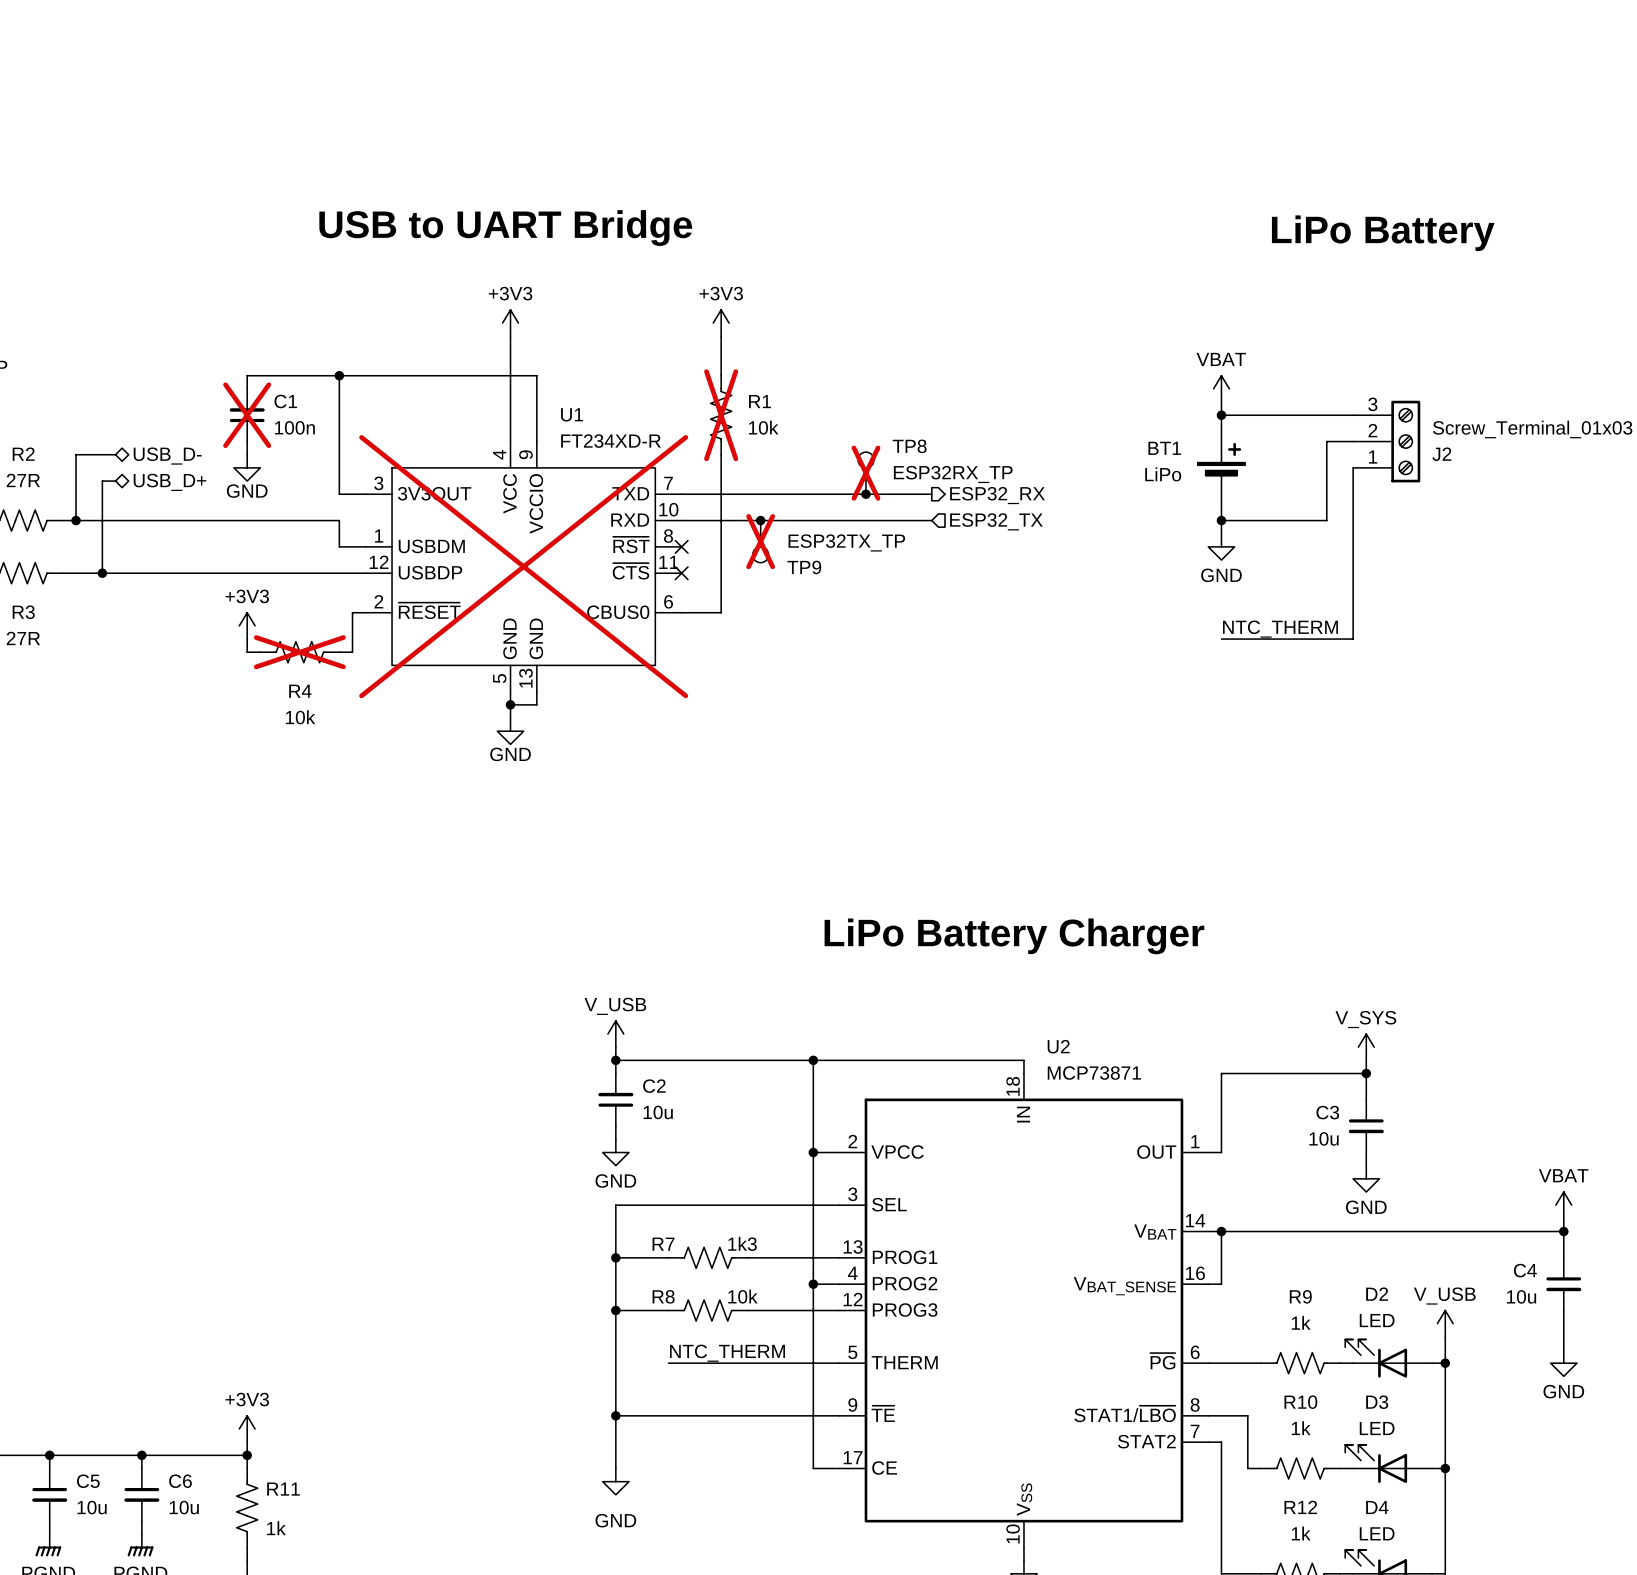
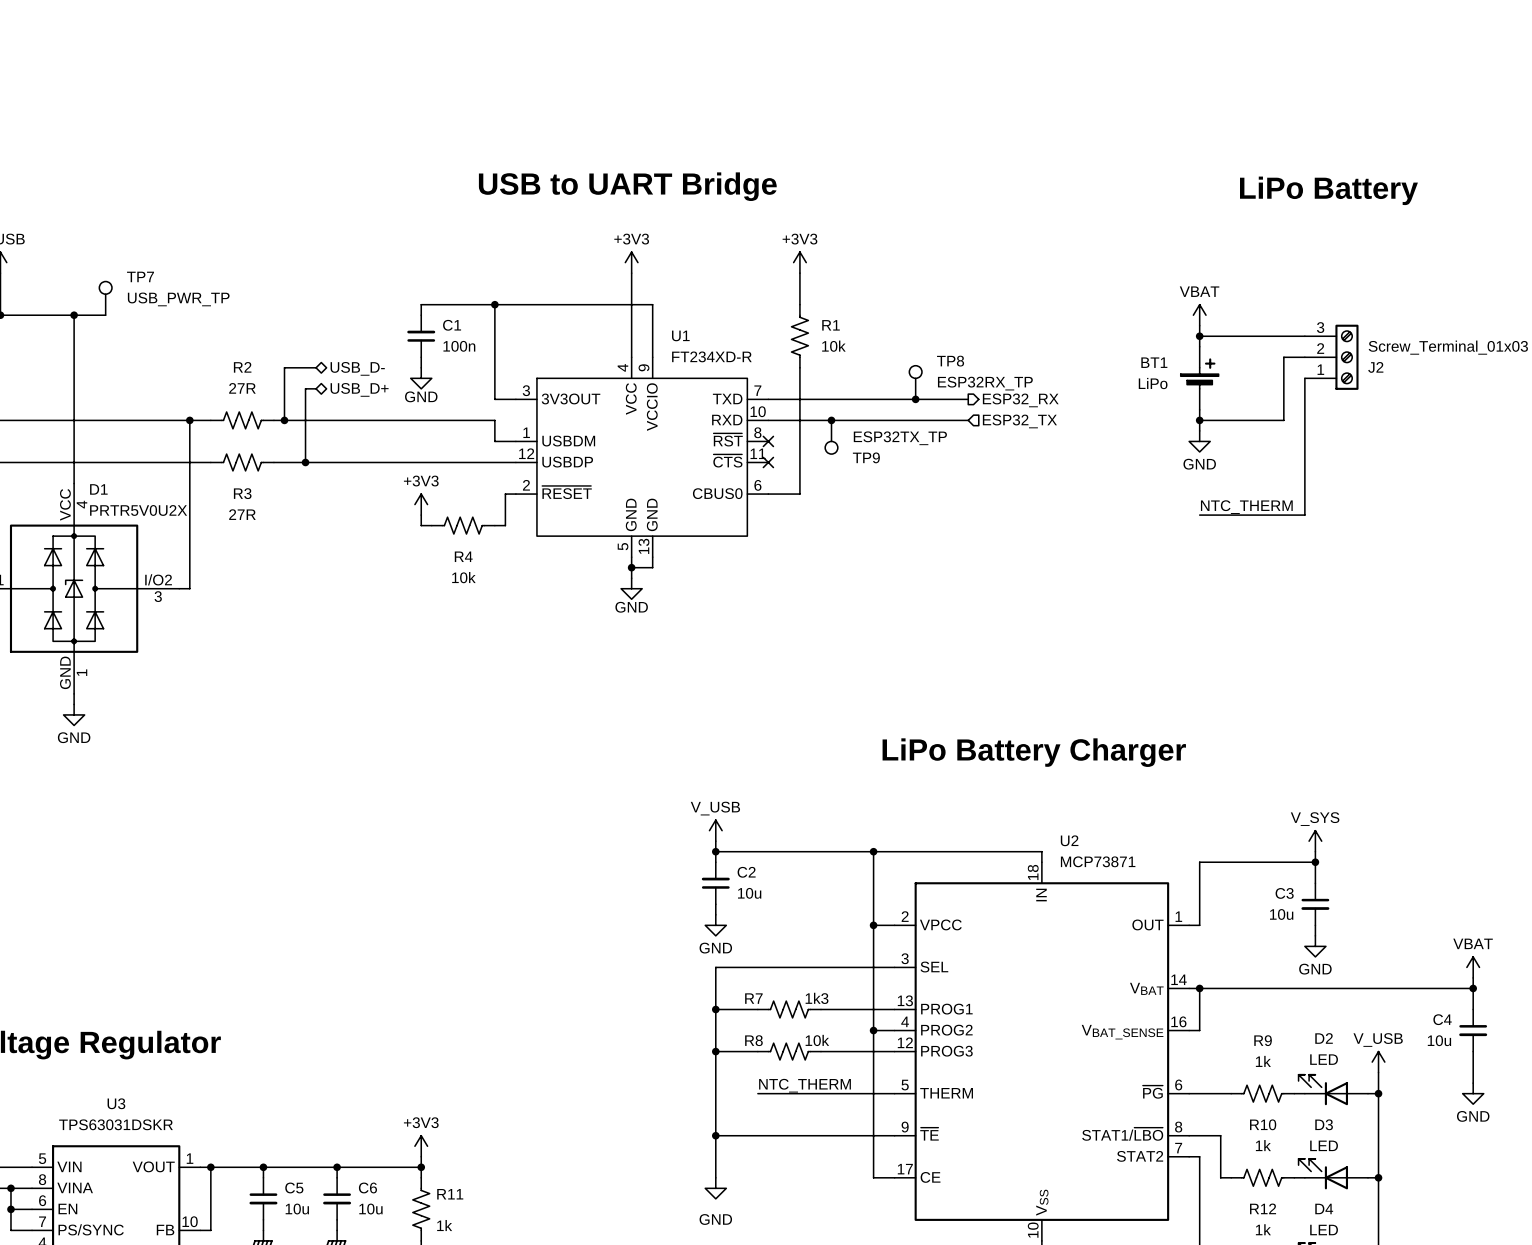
C1 do-not-place cross: (247, 415) -> none
R1 do-not-place cross: (721, 415) -> none
TP8 do-not-place cross: (865, 473) -> none
TP9 do-not-place cross: (760, 541) -> none
U1 do-not-place cross: (523, 566) -> none
R4 do-not-place cross: (299, 652) -> none

